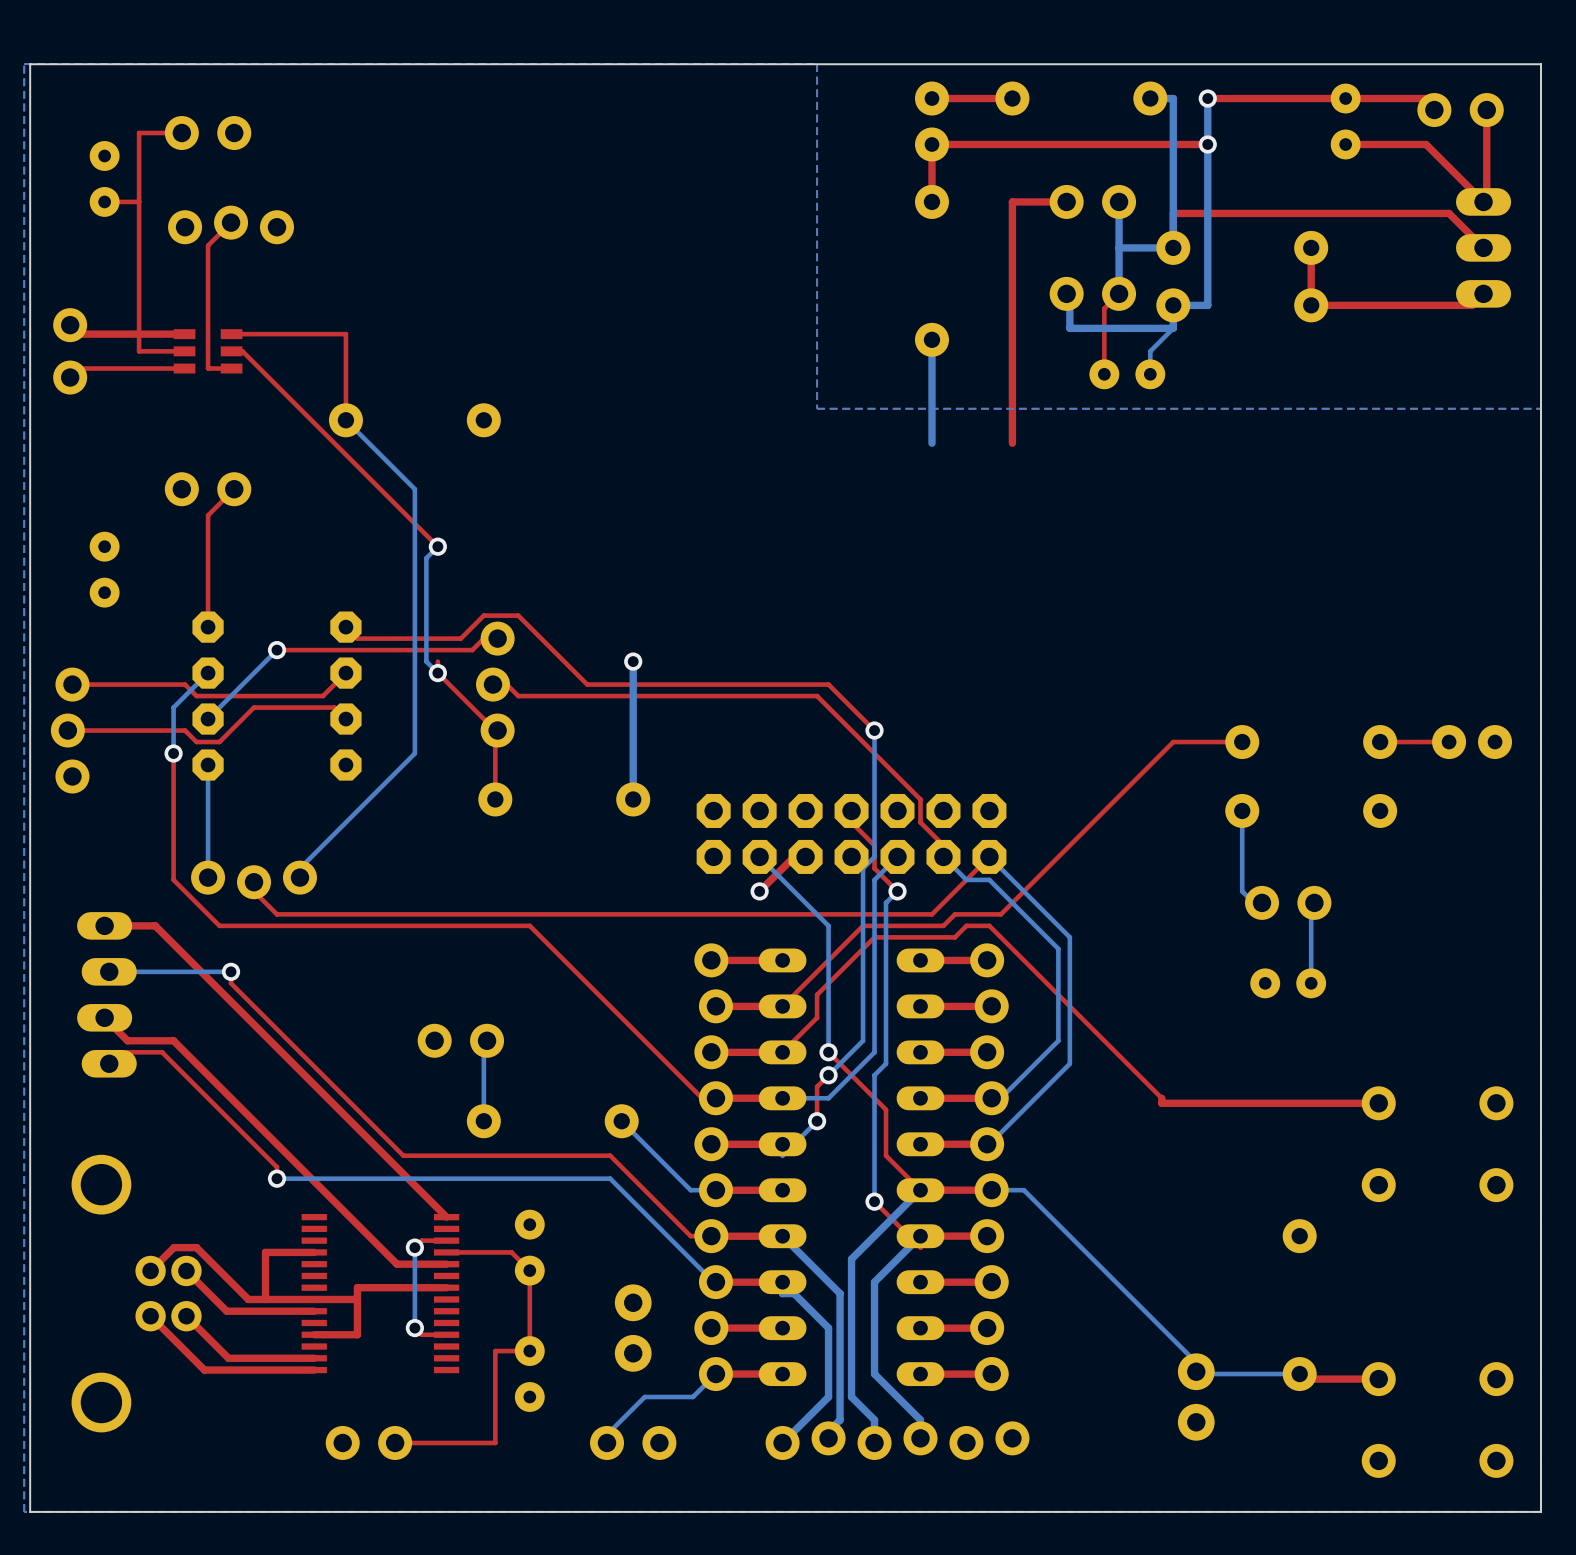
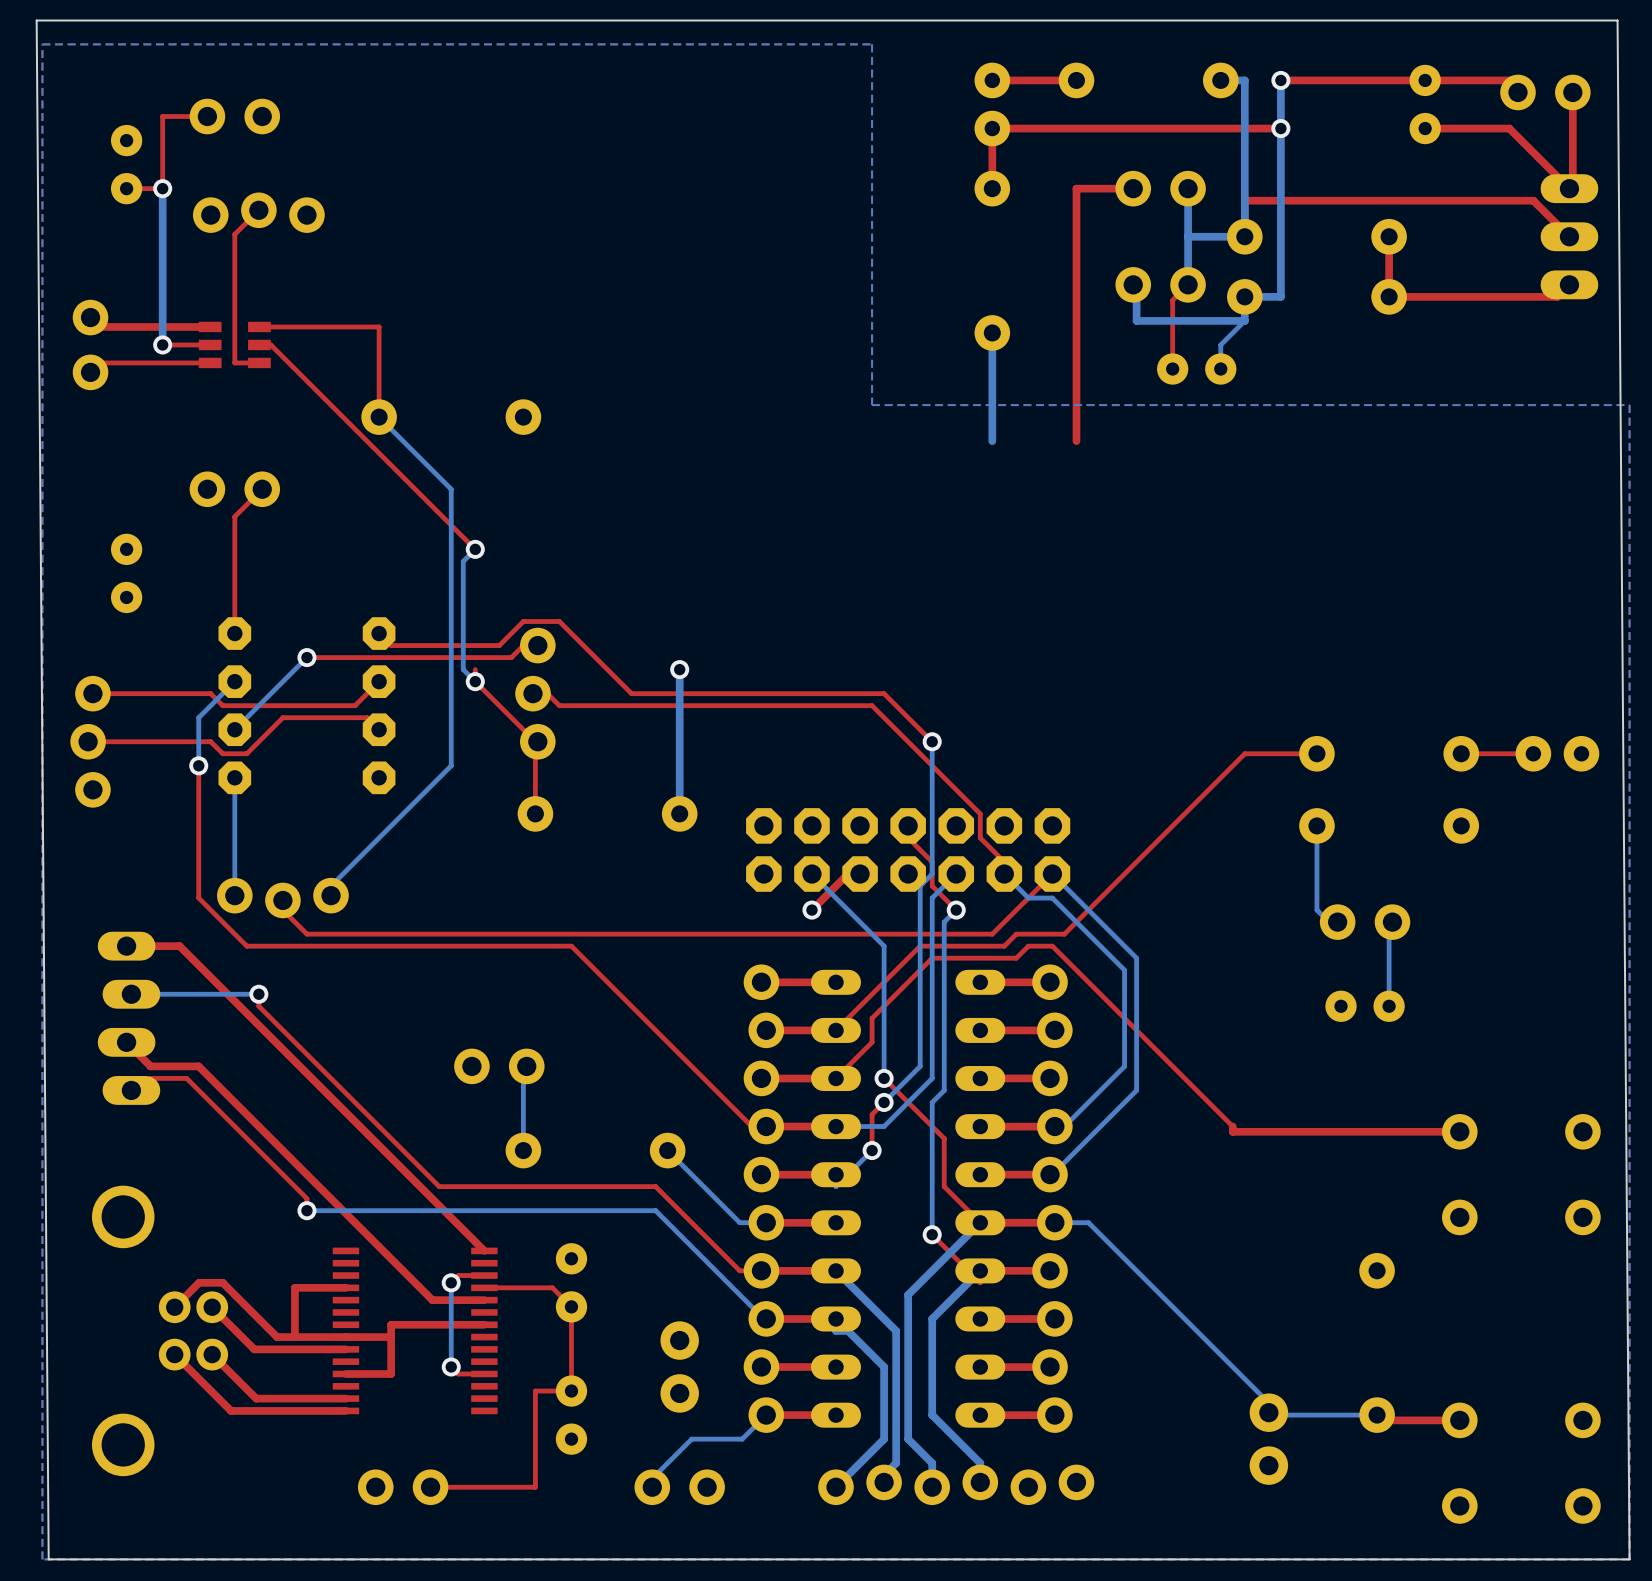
top track: (139, 201) (139, 351) -> none
bottom track: none -> (162, 188) (162, 344)
via: none -> (162, 188)
via: none -> (162, 344)
board edge: (1541, 1511) (1541, 64) (30, 64) (30, 1511) -> (1629, 1559) (1617, 20) (36, 20) (48, 1559)

